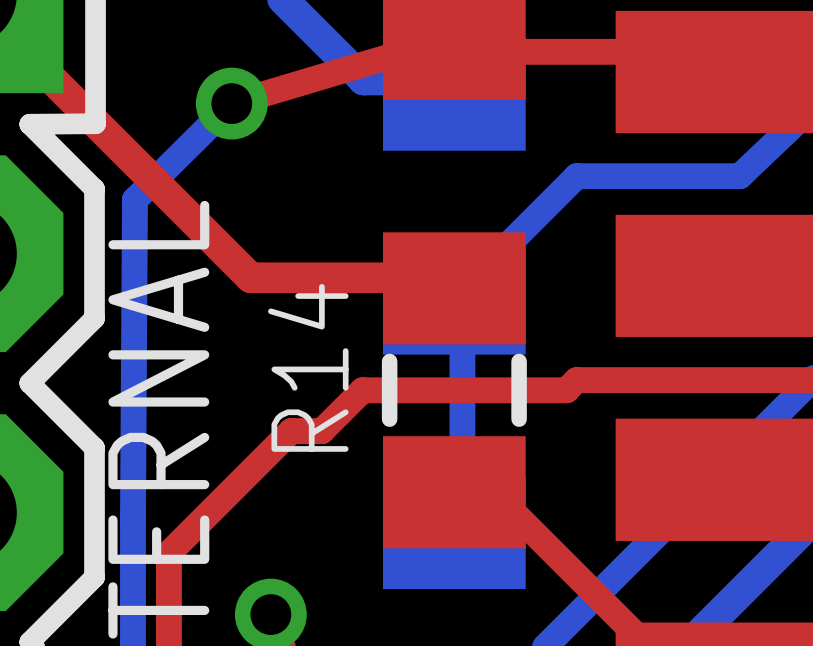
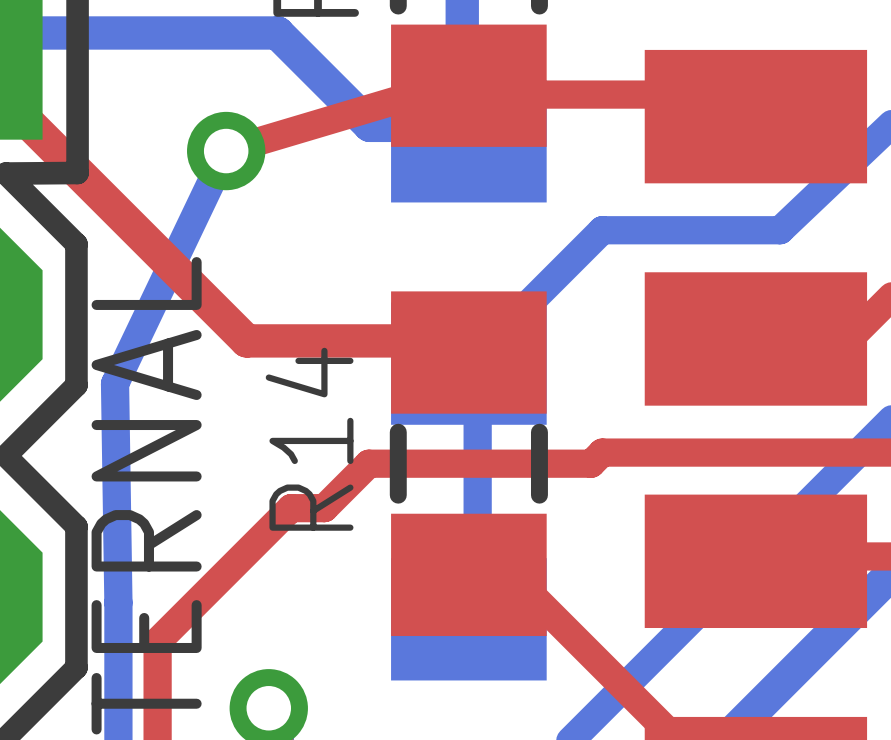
bottom track: (231, 103) (134, 199) (132, 517) -> (226, 151) (115, 383) (118, 602)

